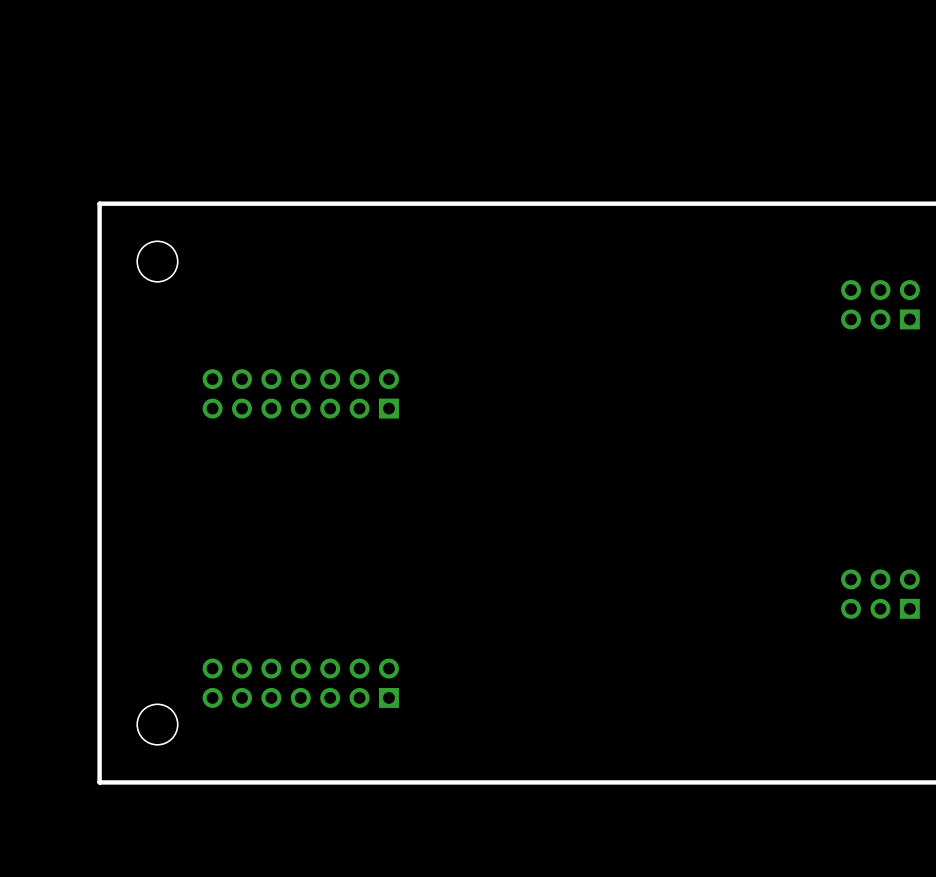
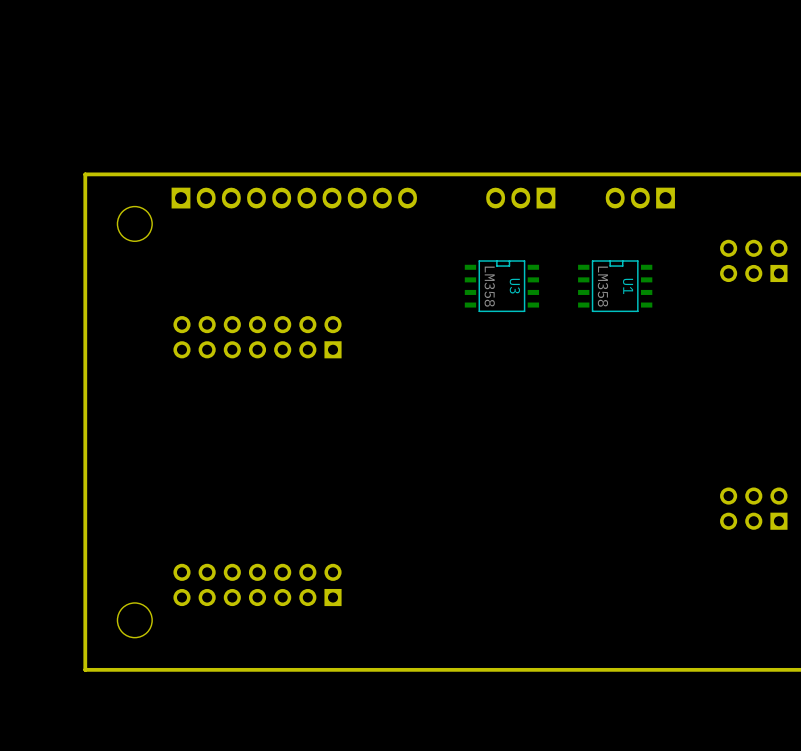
part: none -> (294, 198)
part: none -> (520, 198)
part: none -> (640, 198)
U3: none -> LM358 (501, 286)
U1: none -> LM358 (615, 286)

